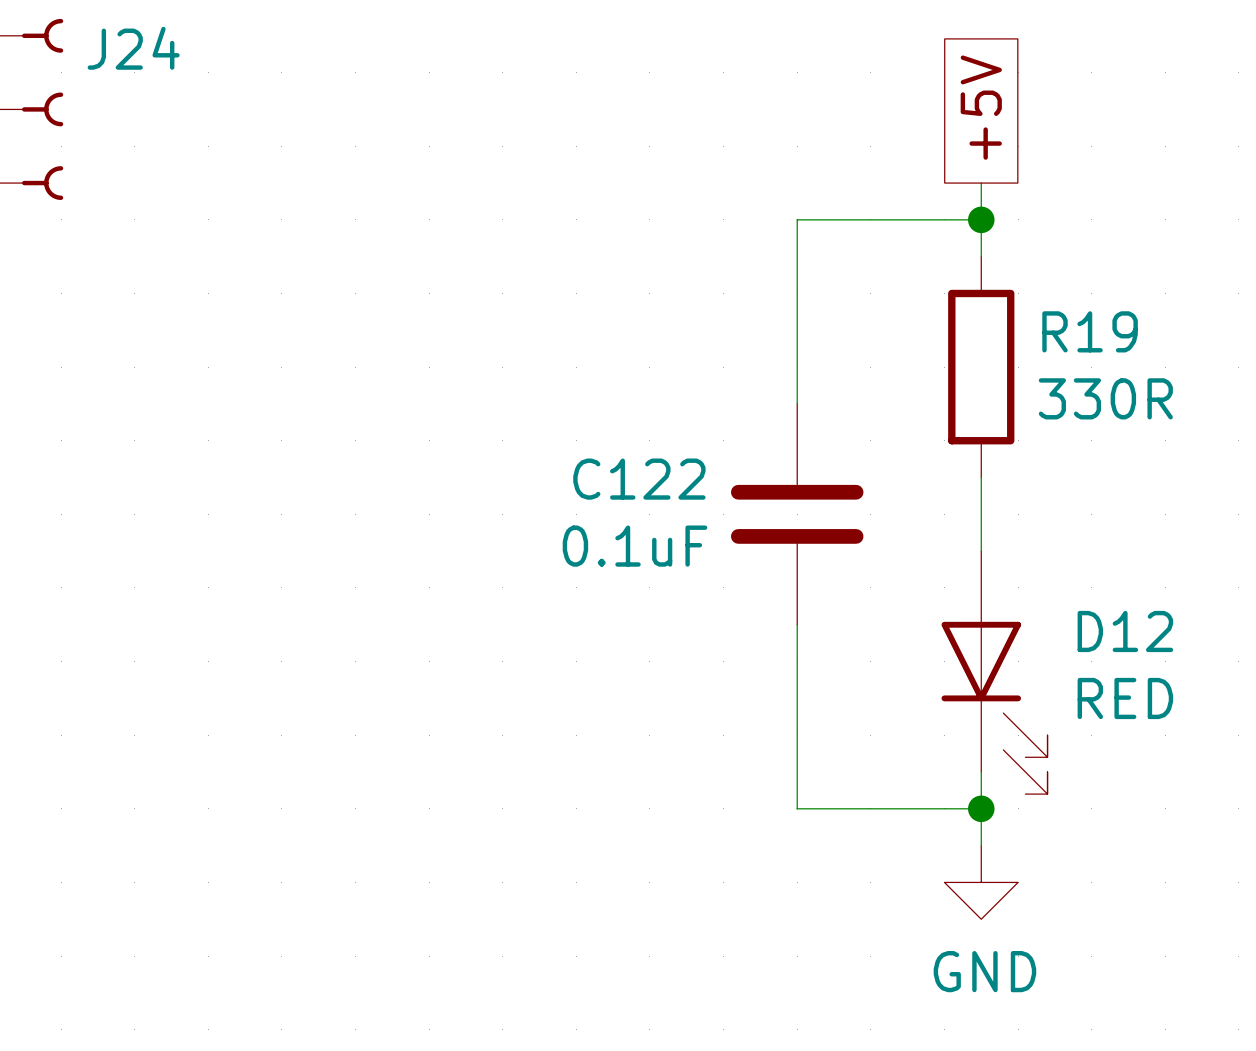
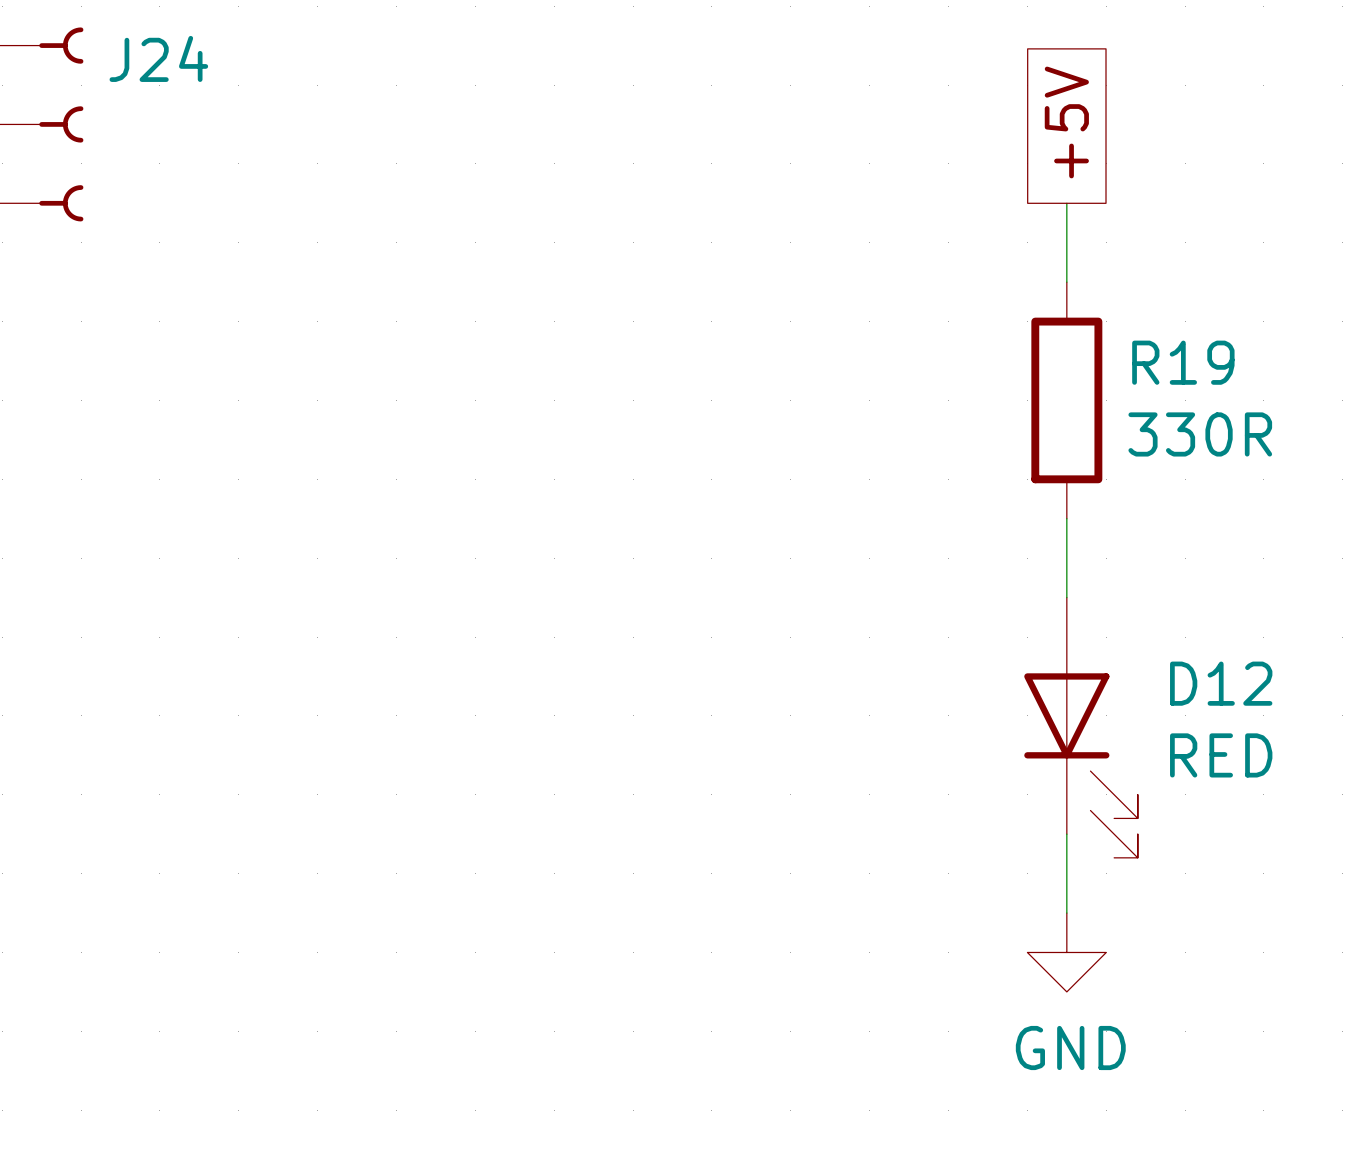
wire: (981, 219) (797, 219) (797, 403) -> none
junction: (981, 219) -> none
C122: 0.1uF (797, 514) -> none
wire: (797, 624) (797, 808) (981, 808) -> none
junction: (981, 808) -> none

